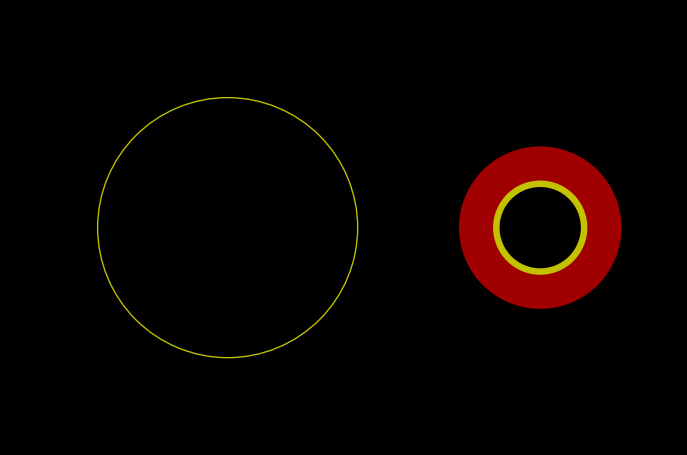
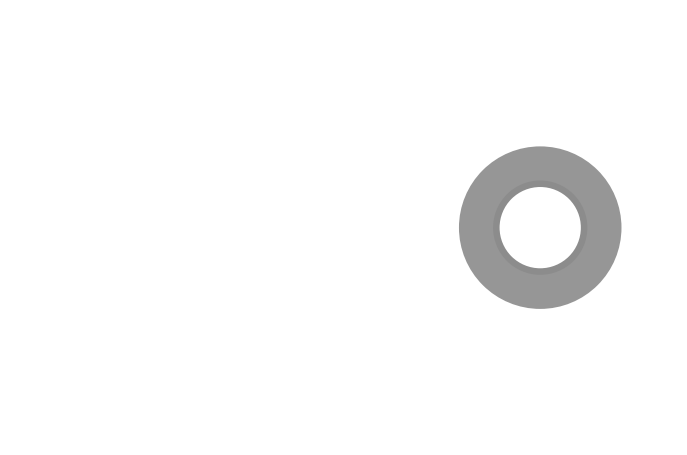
round board edge: [97, 97, 358, 358] -> none

